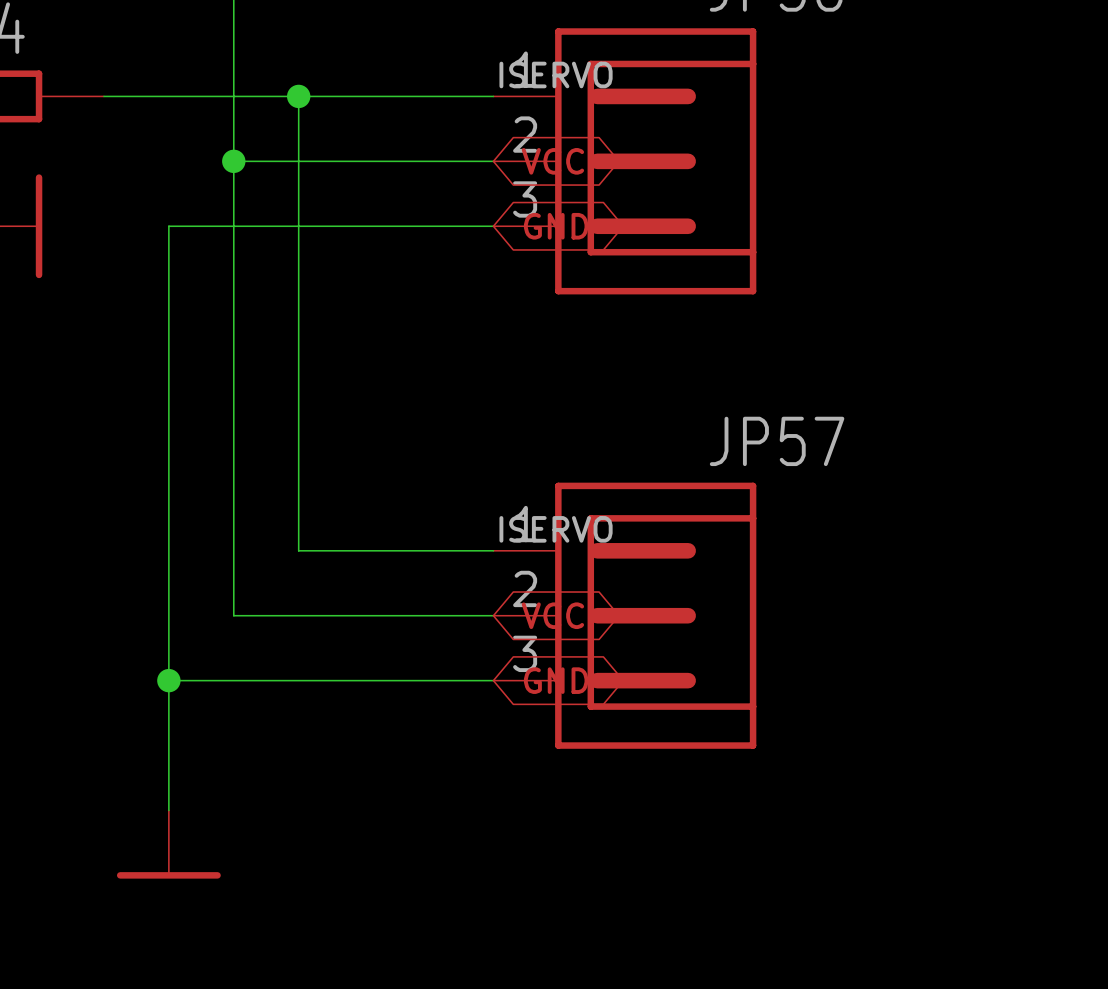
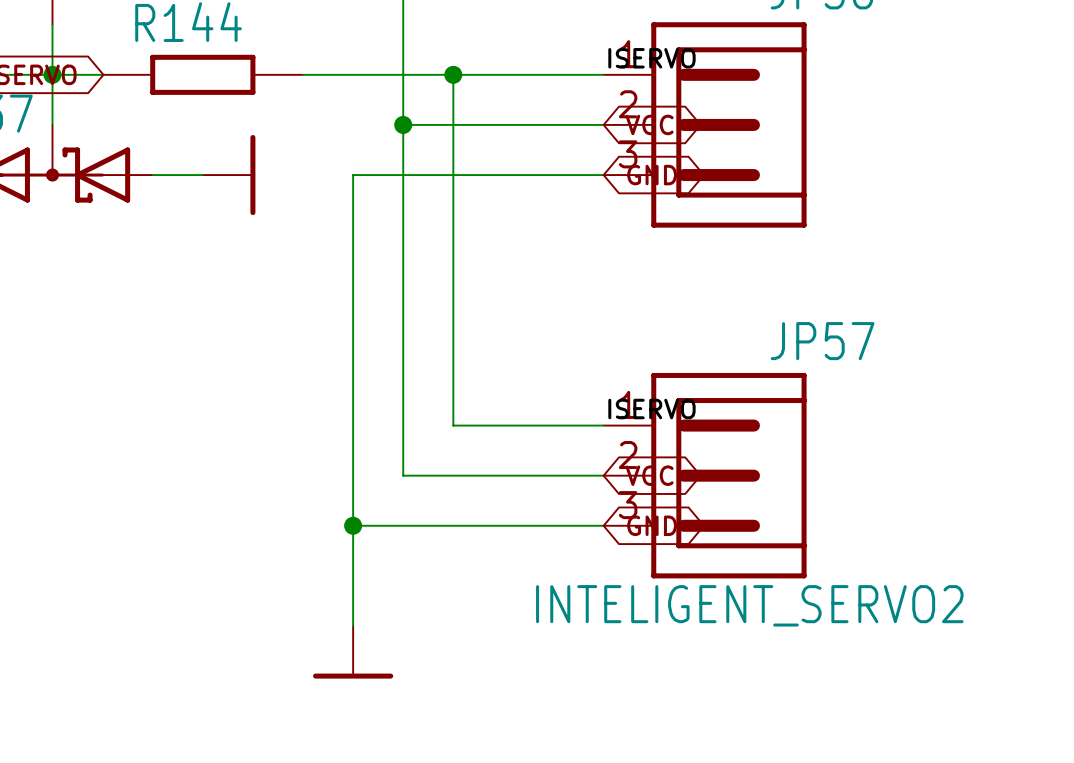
JP57 value: none -> INTELIGENT_SERVO2 (749, 605)

